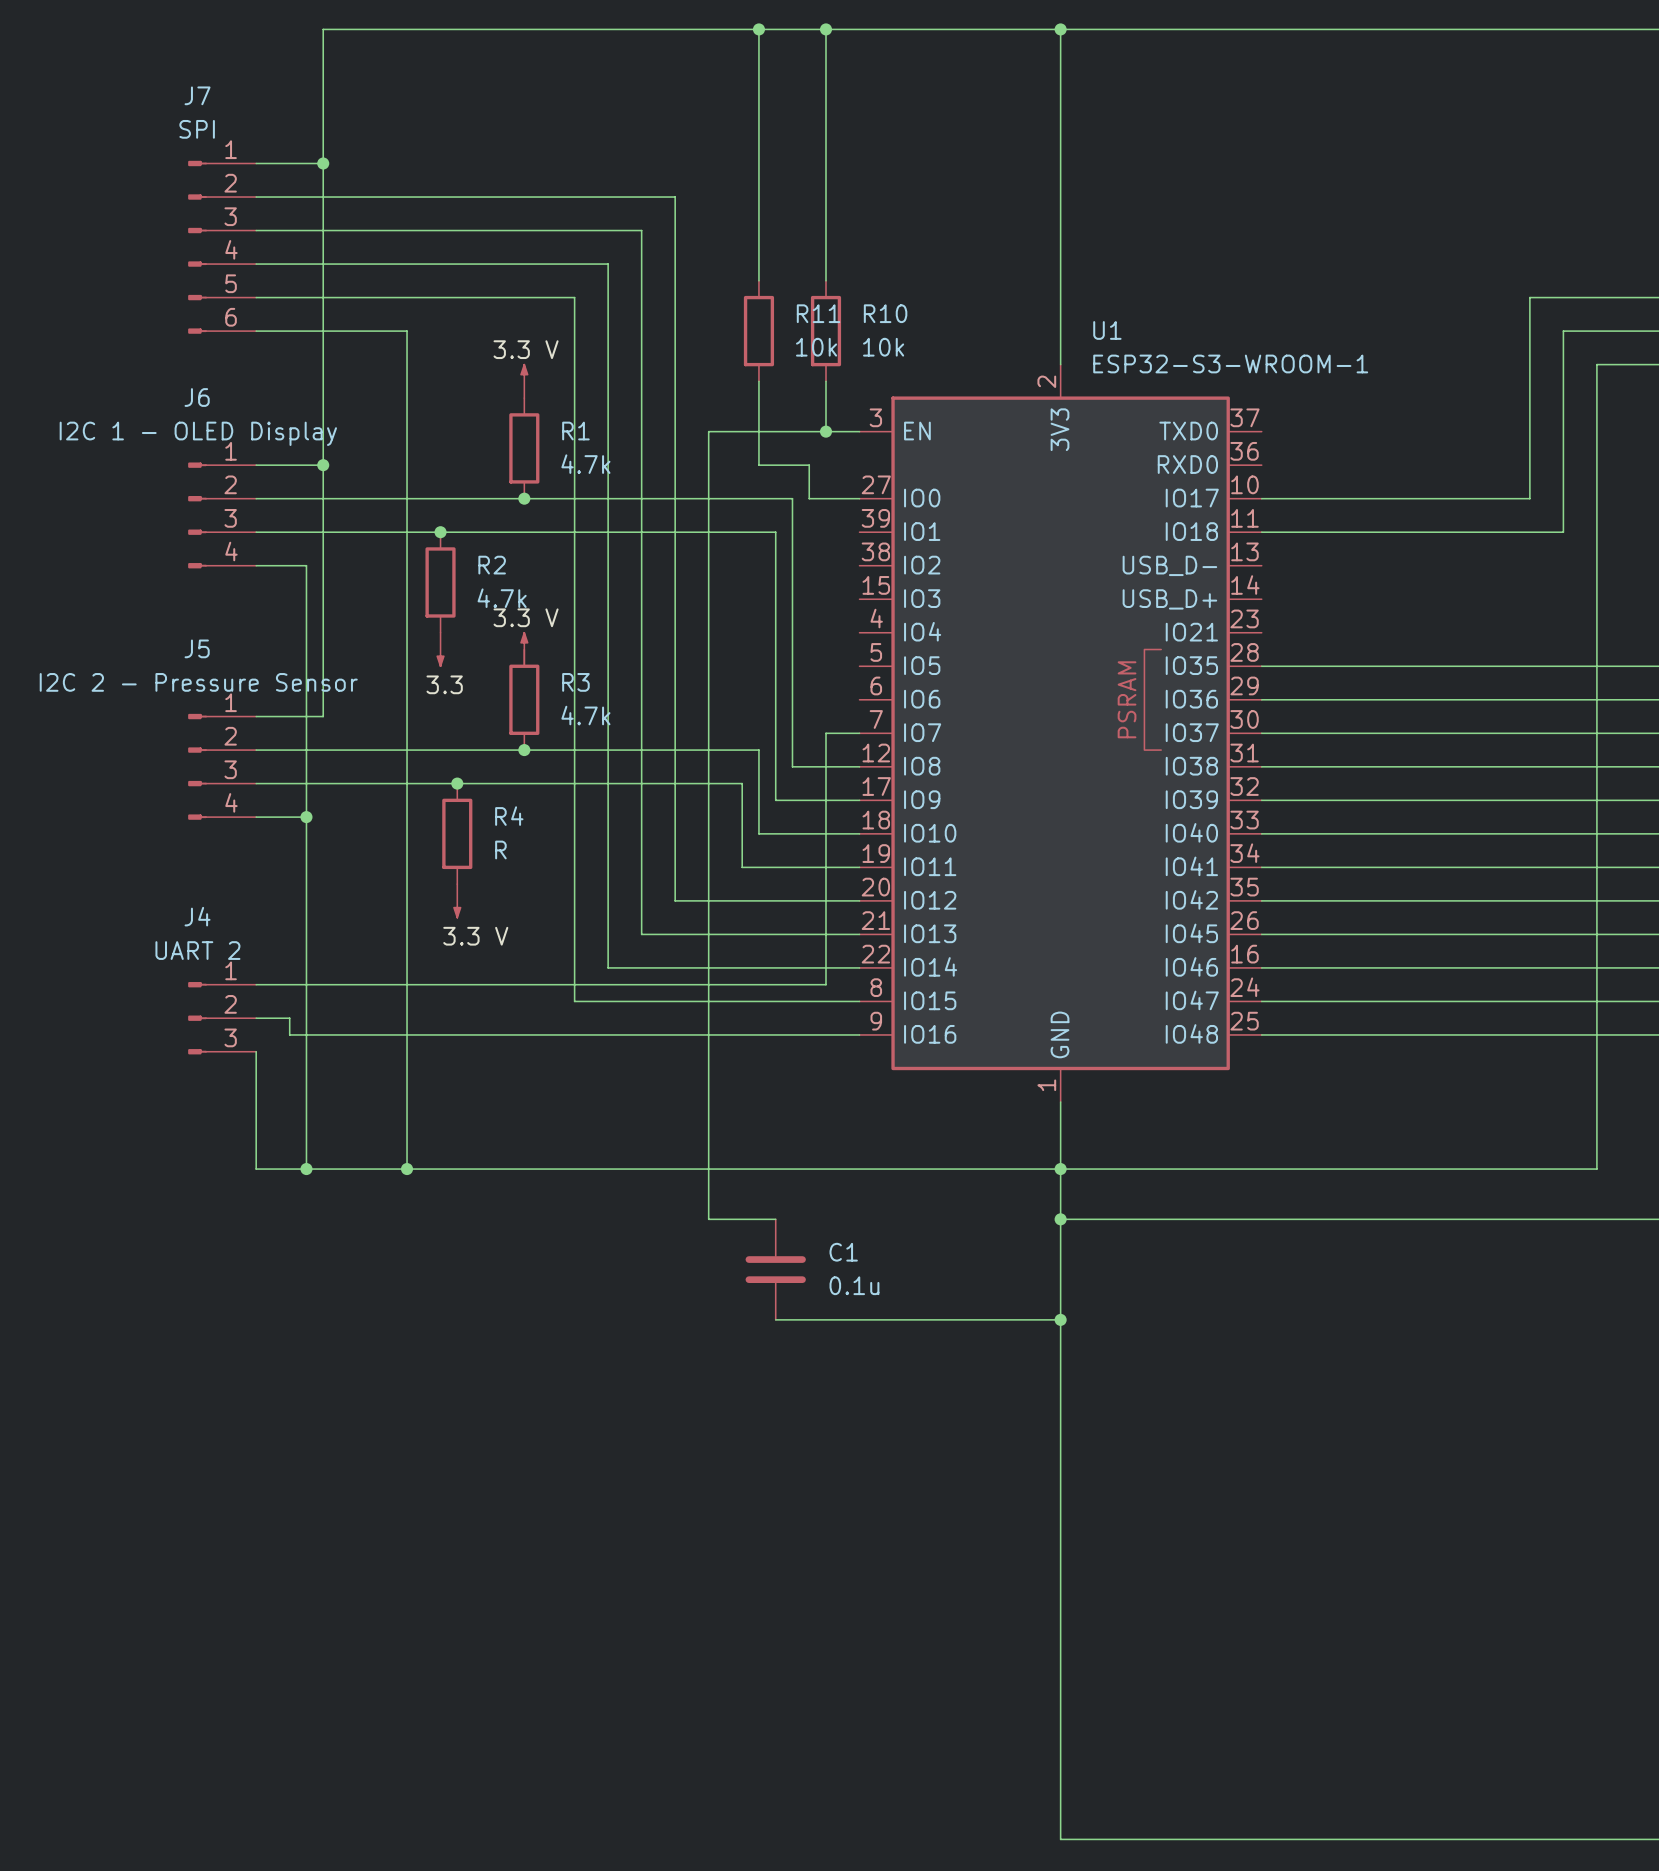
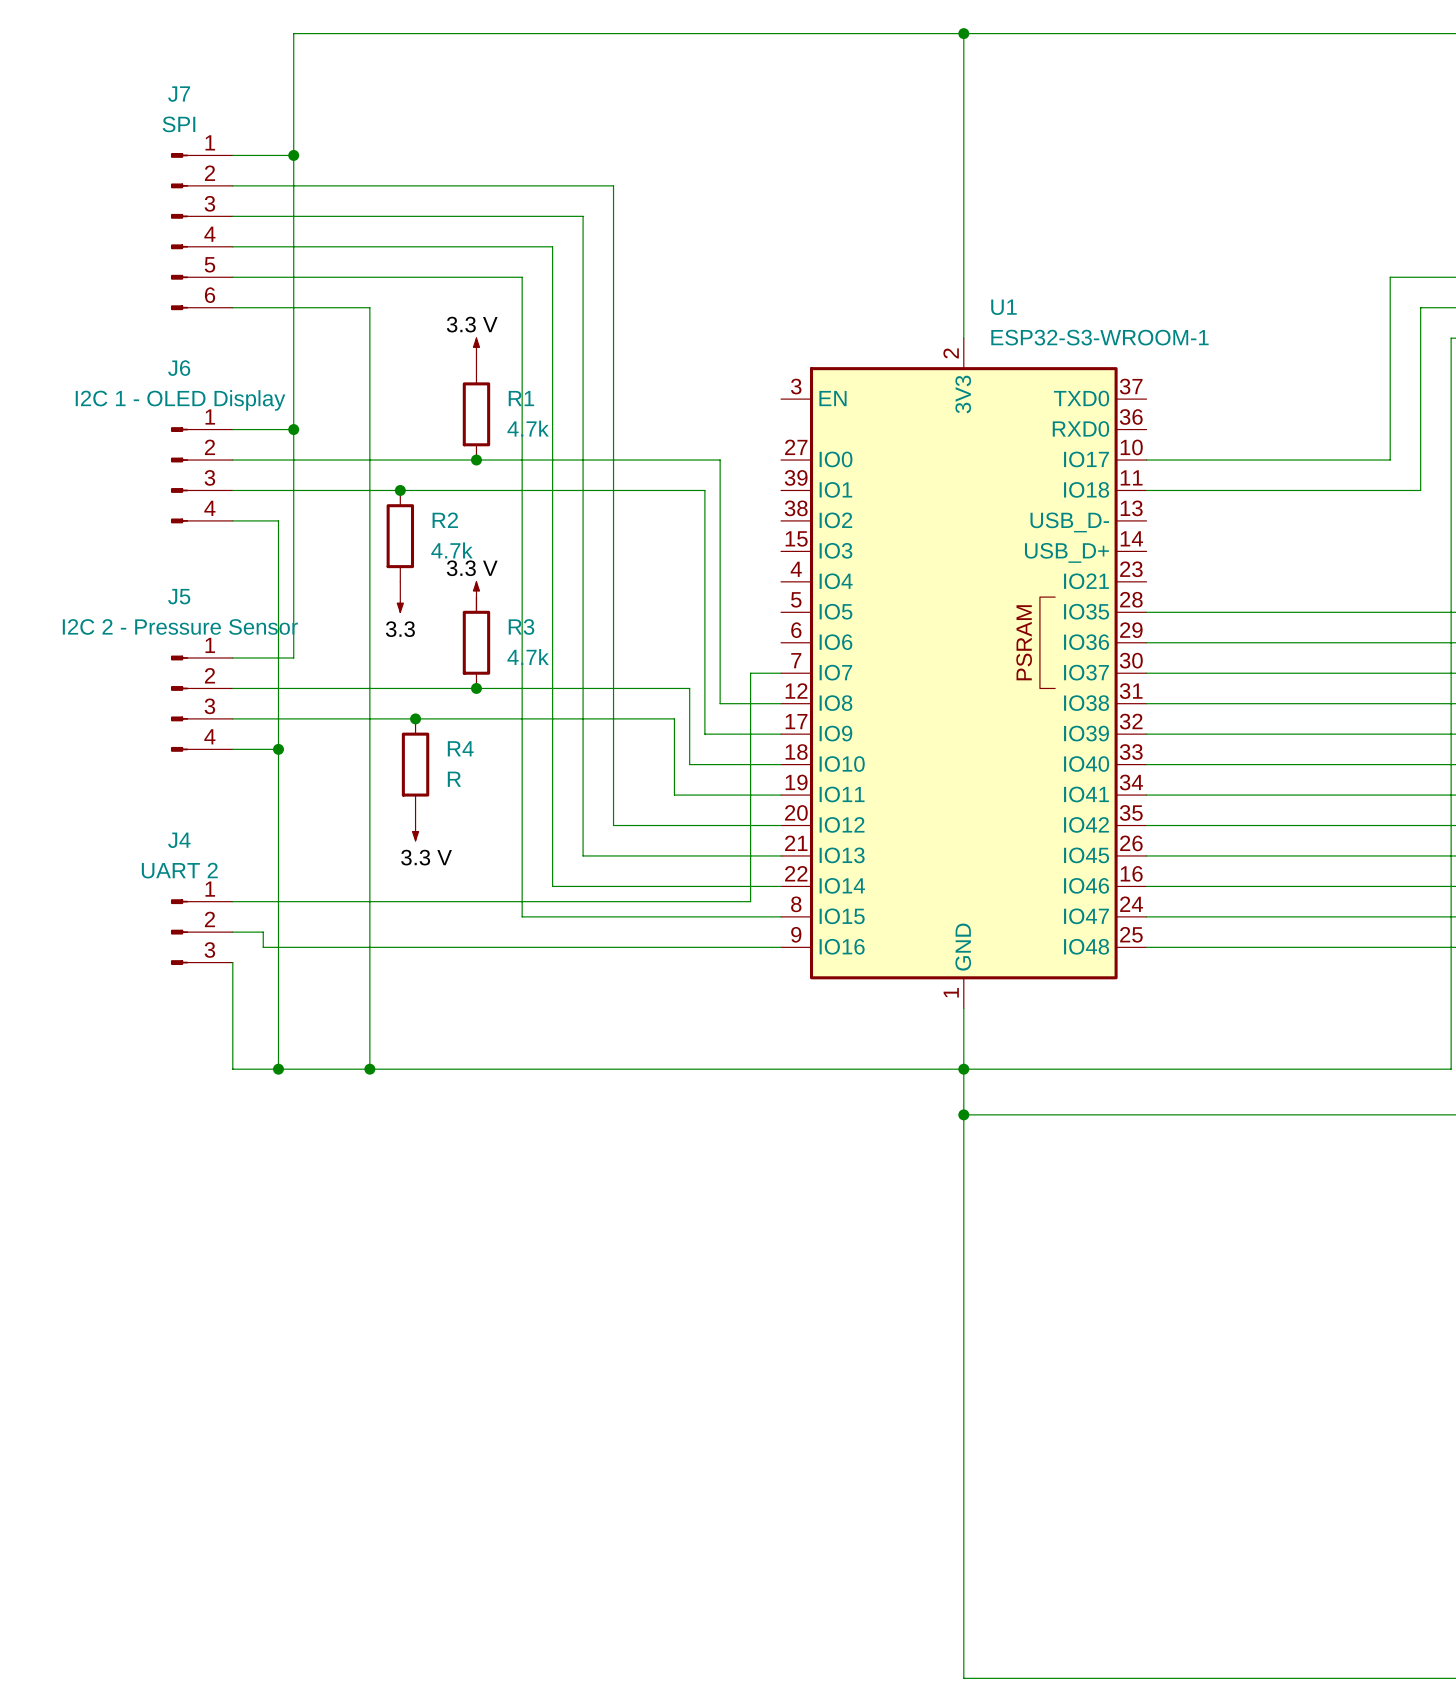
wire: (758, 29) (758, 280) -> none
junction: (758, 29) -> none
wire: (826, 29) (826, 280) -> none
junction: (826, 29) -> none
R11: 10k (758, 331) -> none
R10: 10k (826, 331) -> none
wire: (758, 381) (758, 465) (809, 465) (809, 498) (859, 498) -> none
wire: (826, 381) (826, 431) -> none
junction: (826, 431) -> none
wire: (859, 431) (708, 431) (708, 1219) (775, 1219) -> none
C1: 0.1u (775, 1269) -> none
wire: (775, 1319) (1060, 1319) -> none
junction: (1060, 1319) -> none

